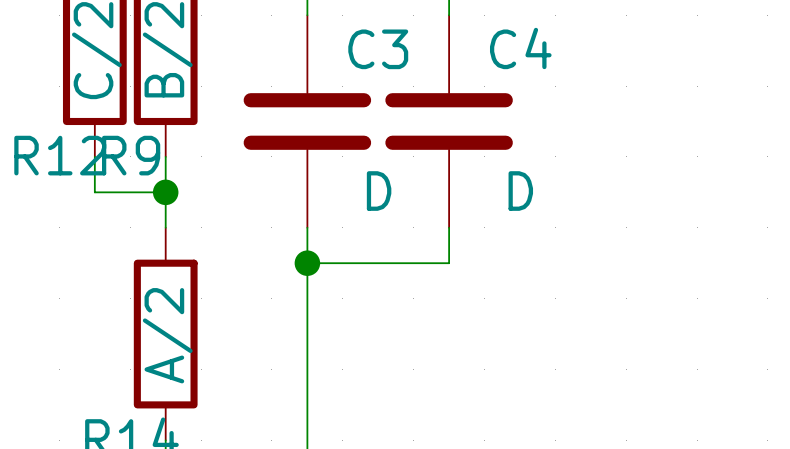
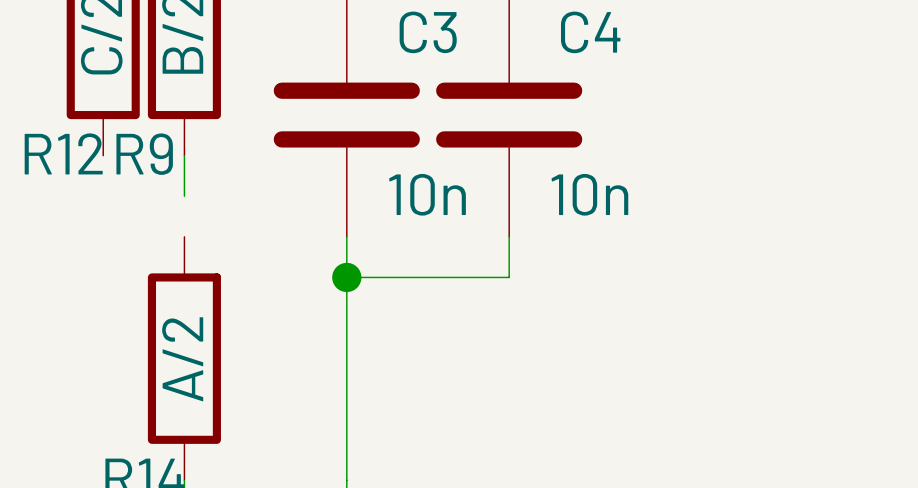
wire: (94, 156) (94, 192) (165, 192) (165, 227) -> none
C3 value: D (379, 191) -> 10n (427, 194)
C4 value: D (520, 191) -> 10n (589, 194)
junction: (165, 192) -> none

